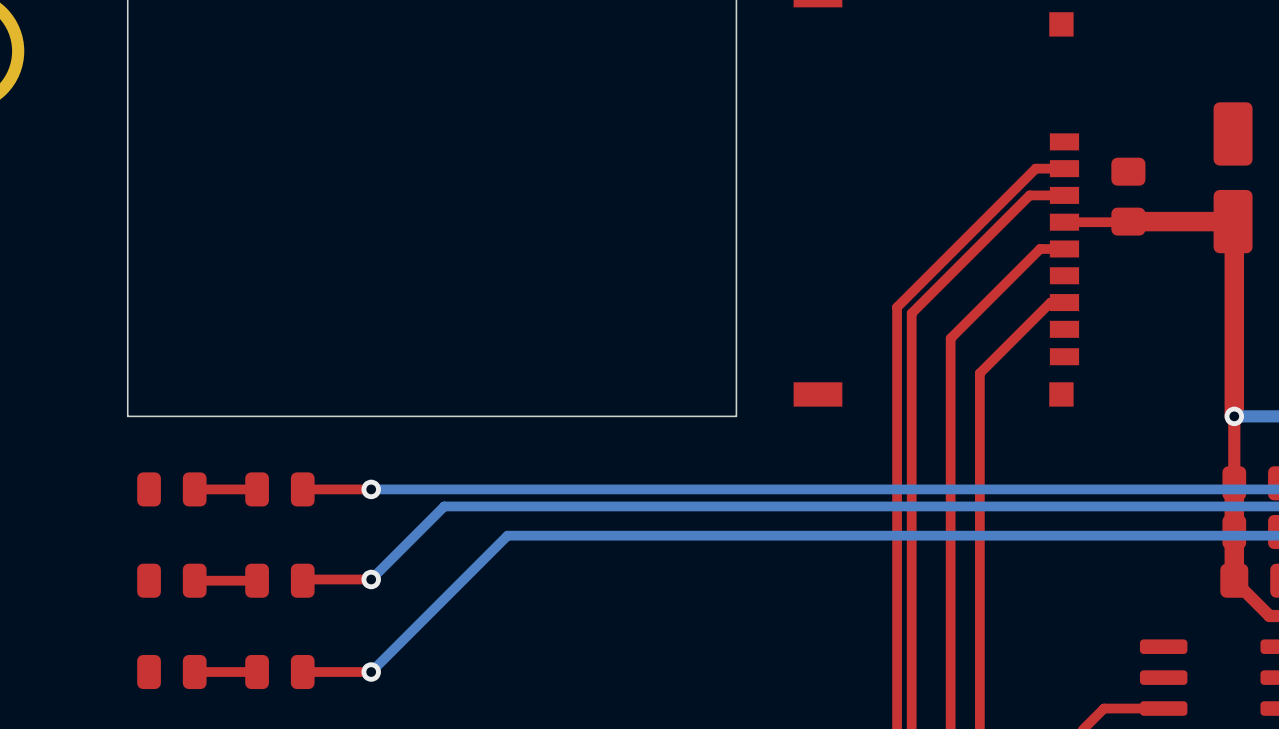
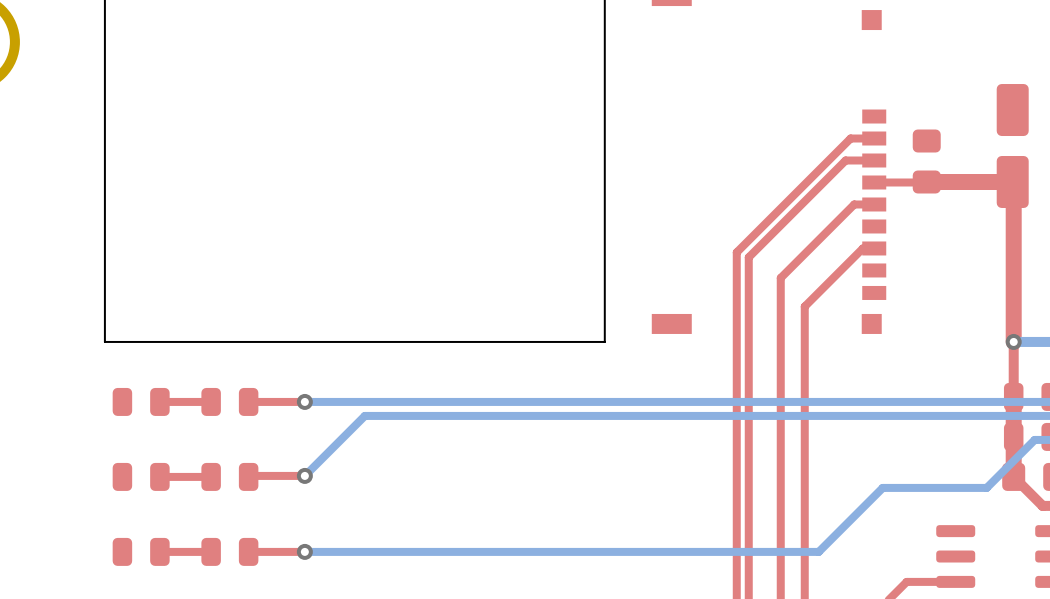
bottom track: (1259, 535) (507, 535) (371, 672) -> (1034, 439) (986, 487) (882, 487) (818, 551) (304, 551)

